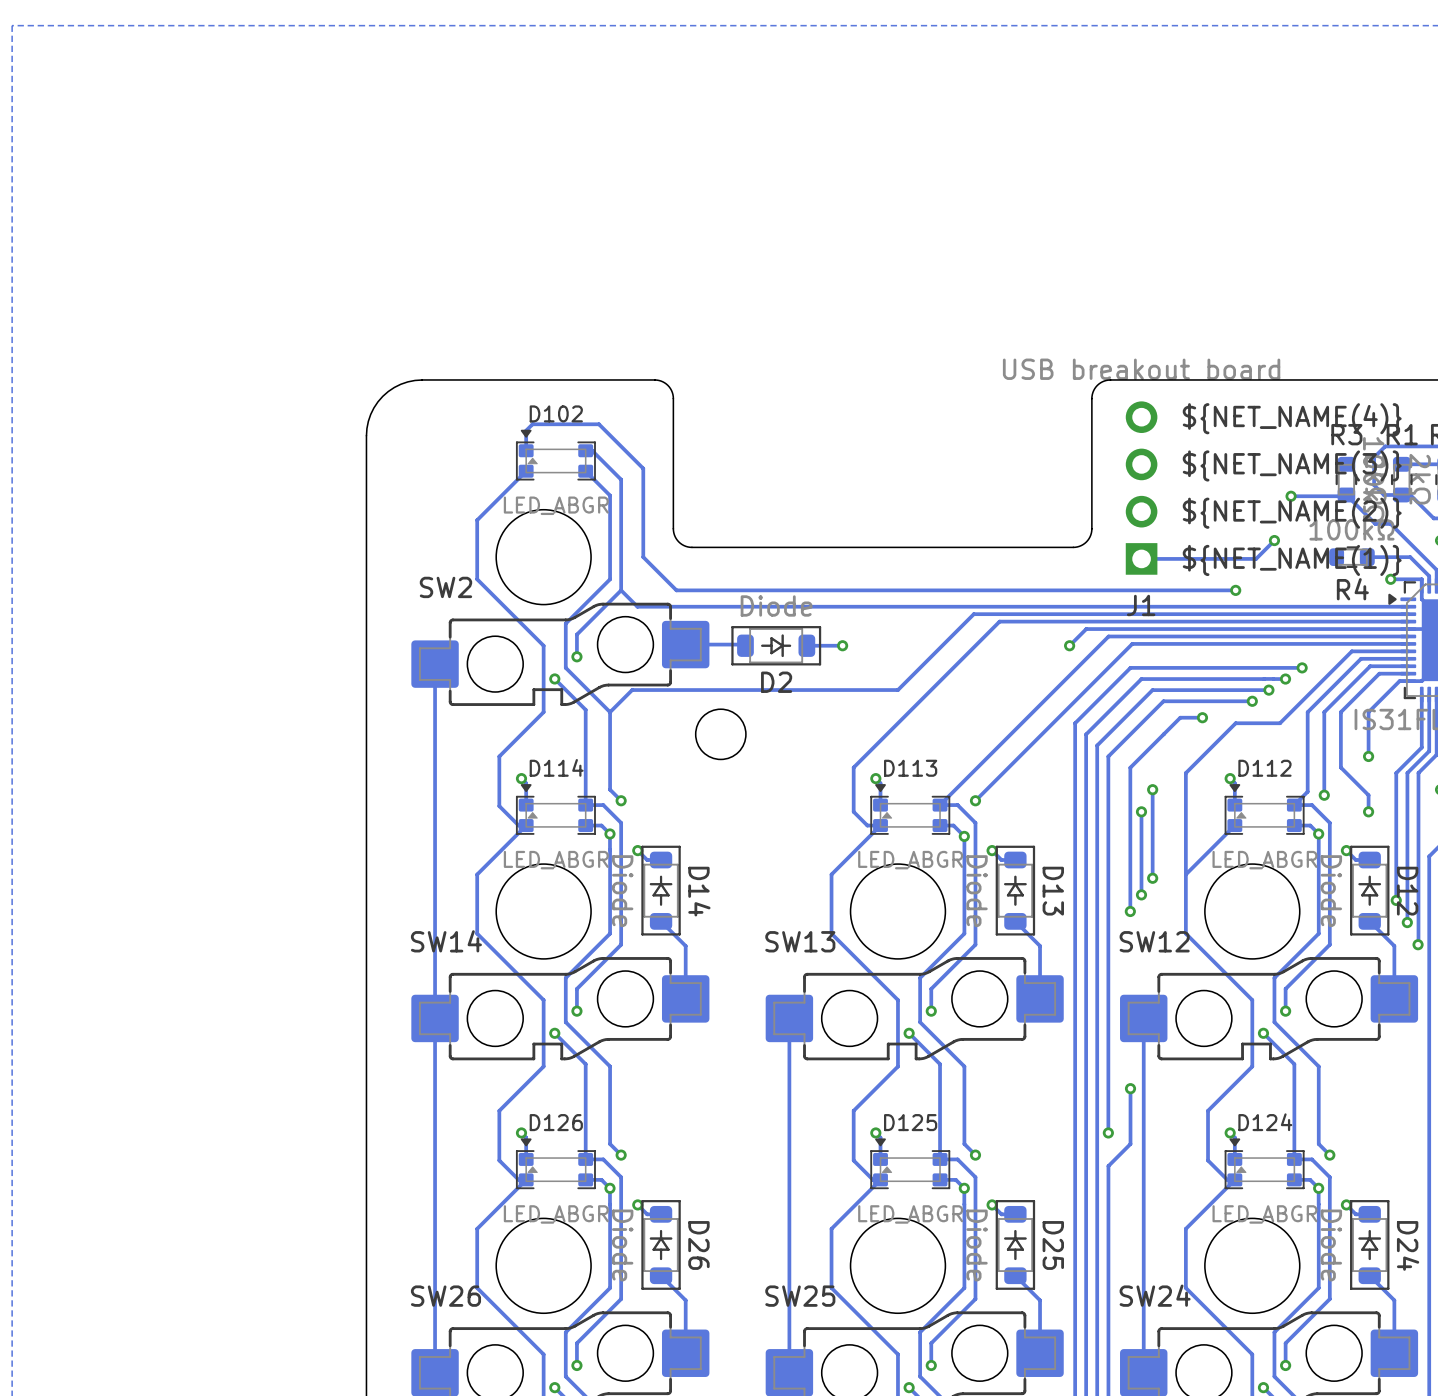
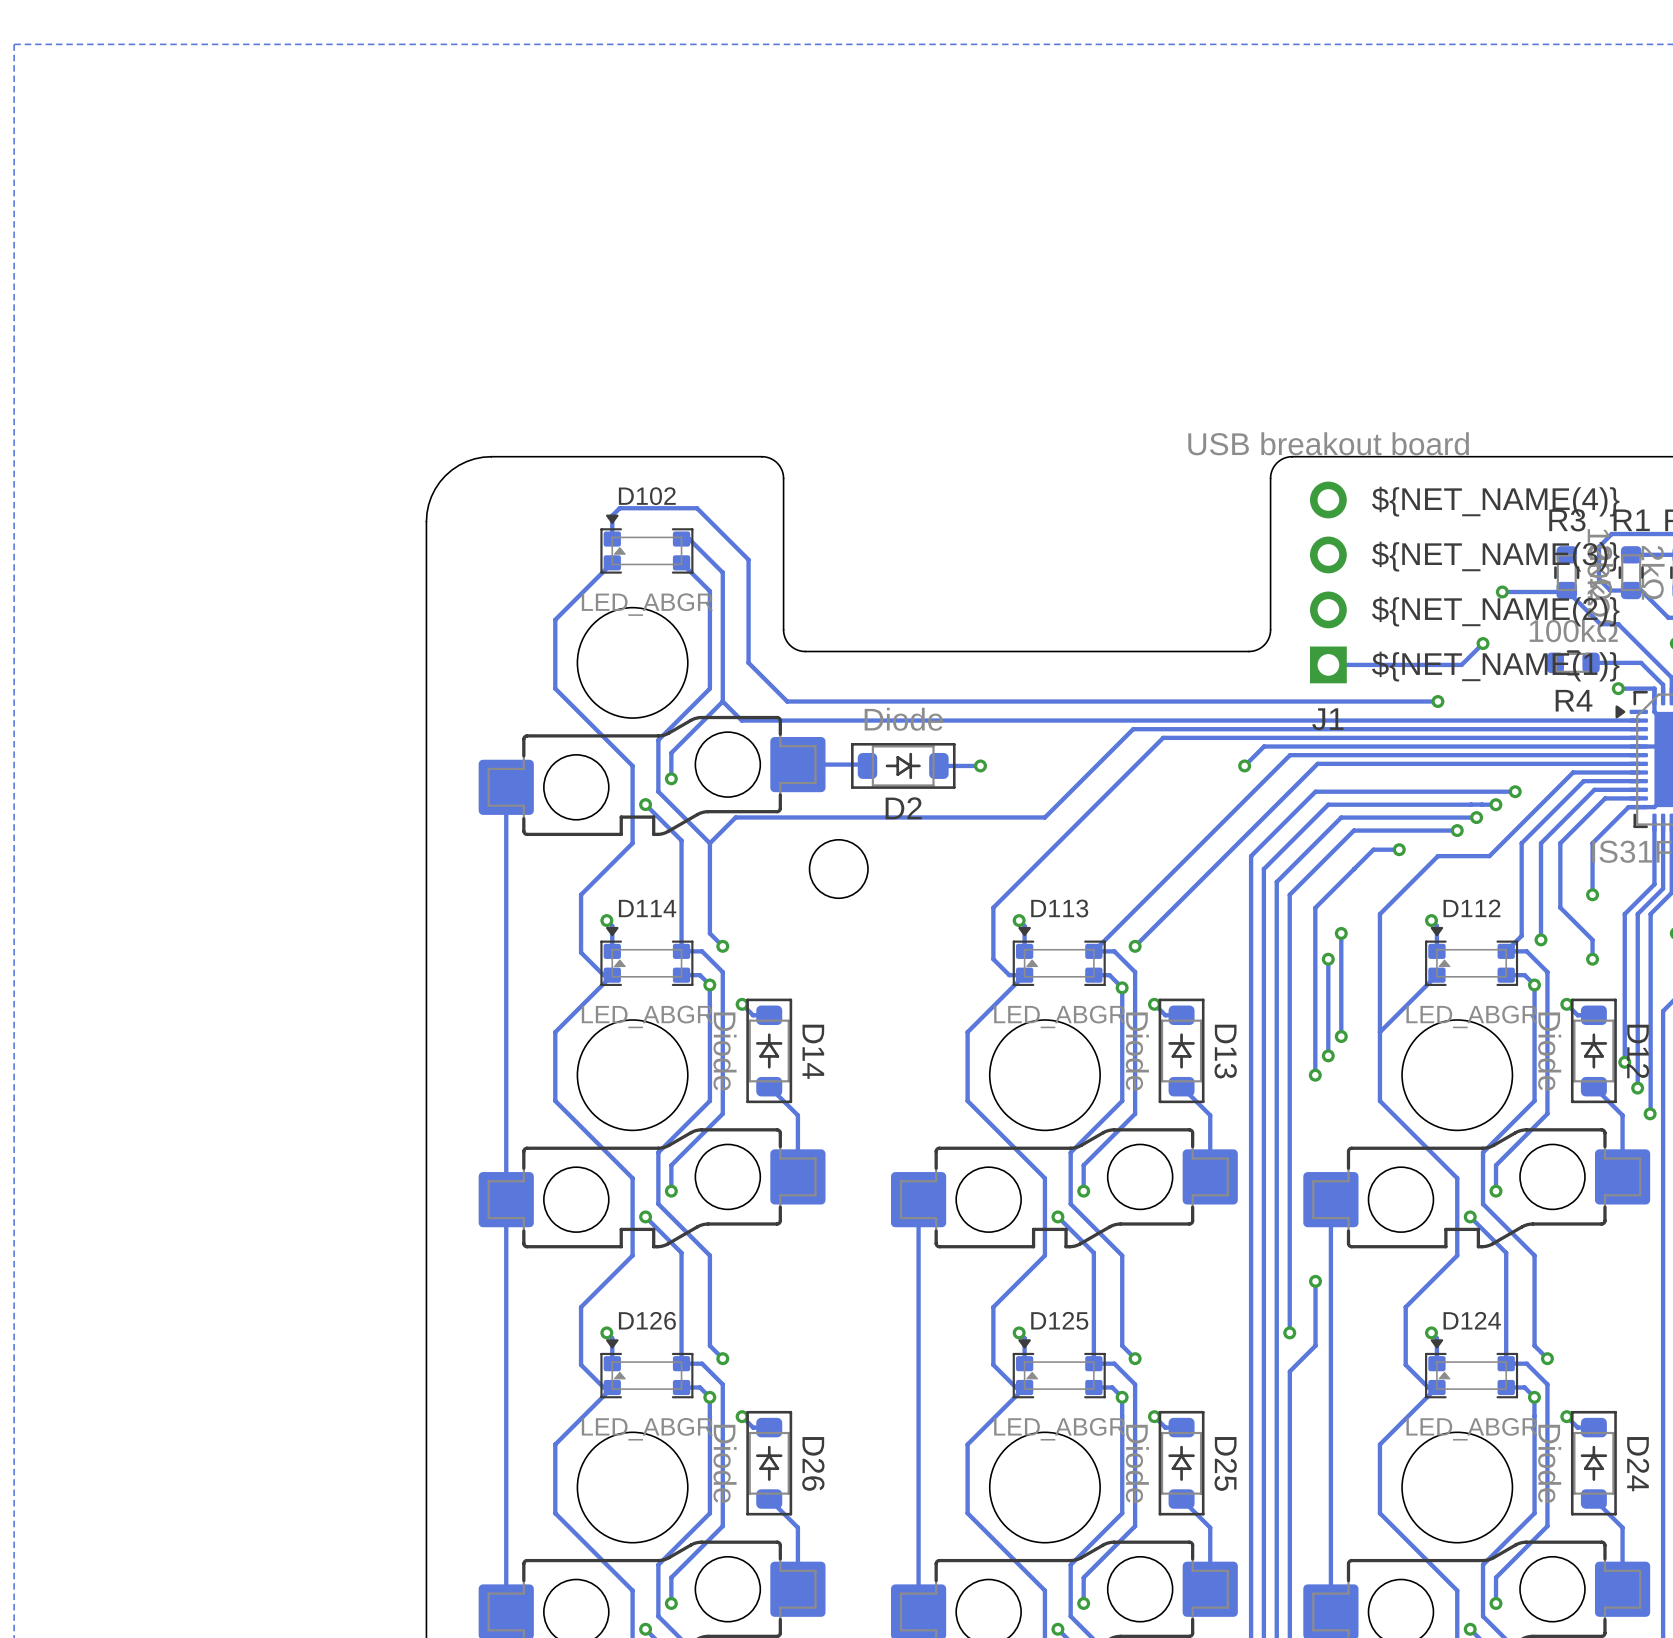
SW2 name: SW2 (445, 587) -> none
SW14 name: SW14 (446, 941) -> none
SW13 name: SW13 (800, 941) -> none
SW12 name: SW12 (1154, 941) -> none
SW24 name: SW24 (1155, 1295) -> none
SW26 name: SW26 (445, 1296) -> none
SW25 name: SW25 (800, 1296) -> none

